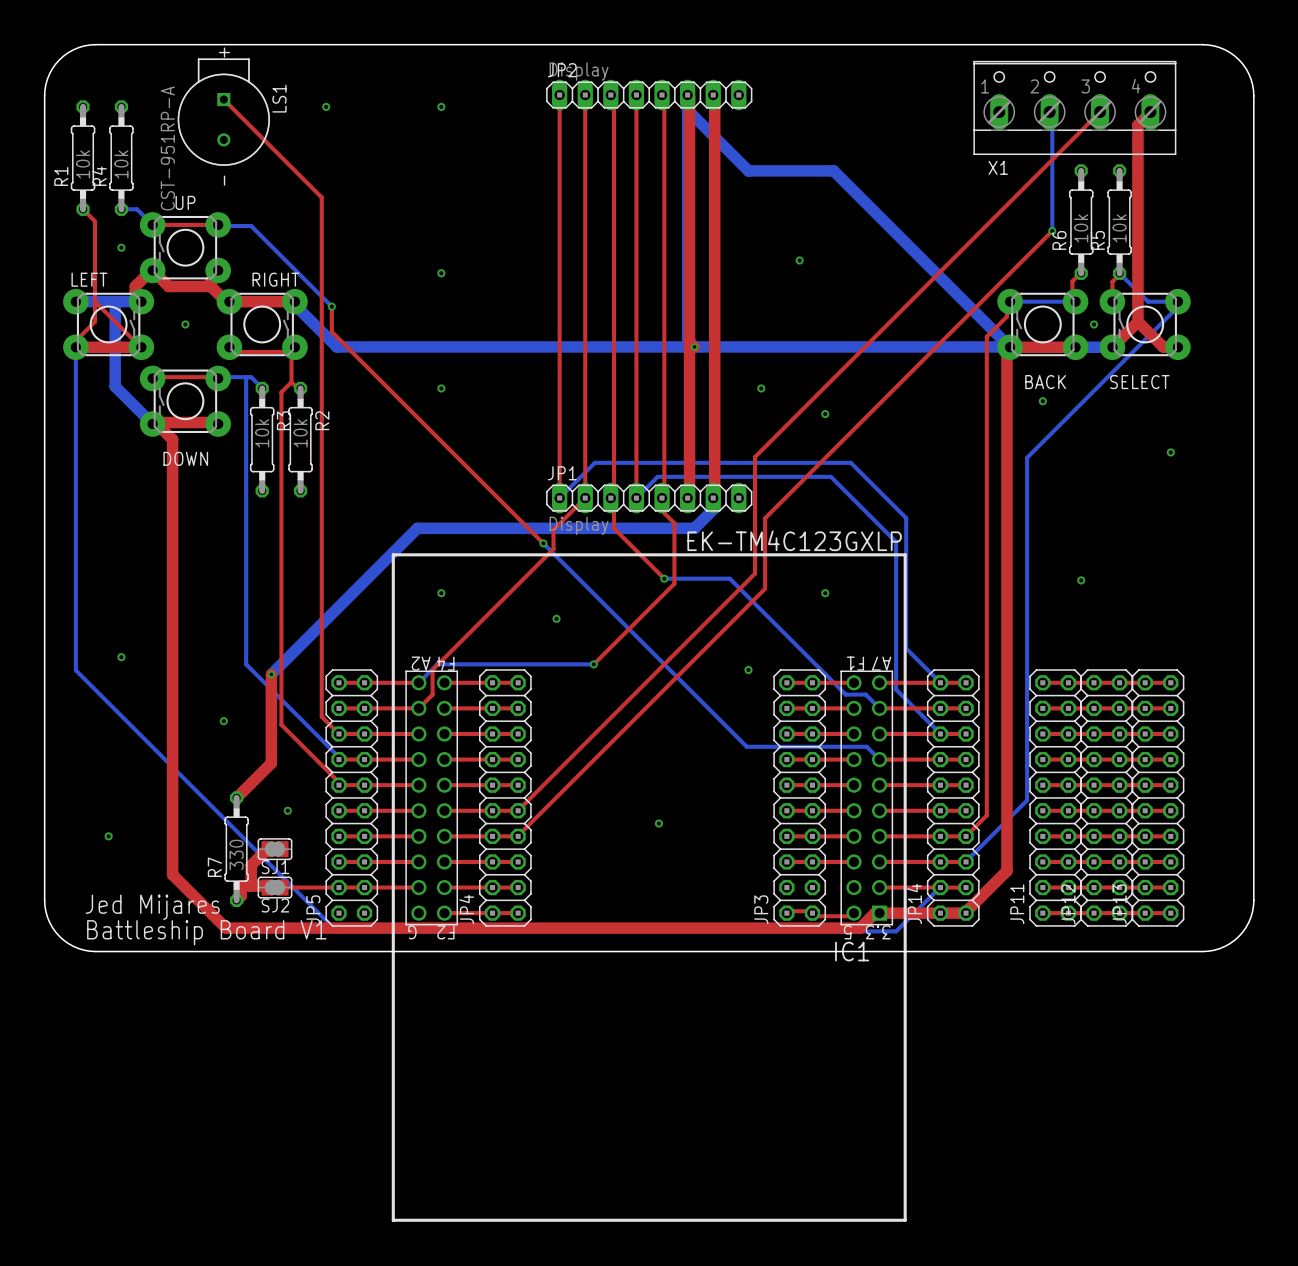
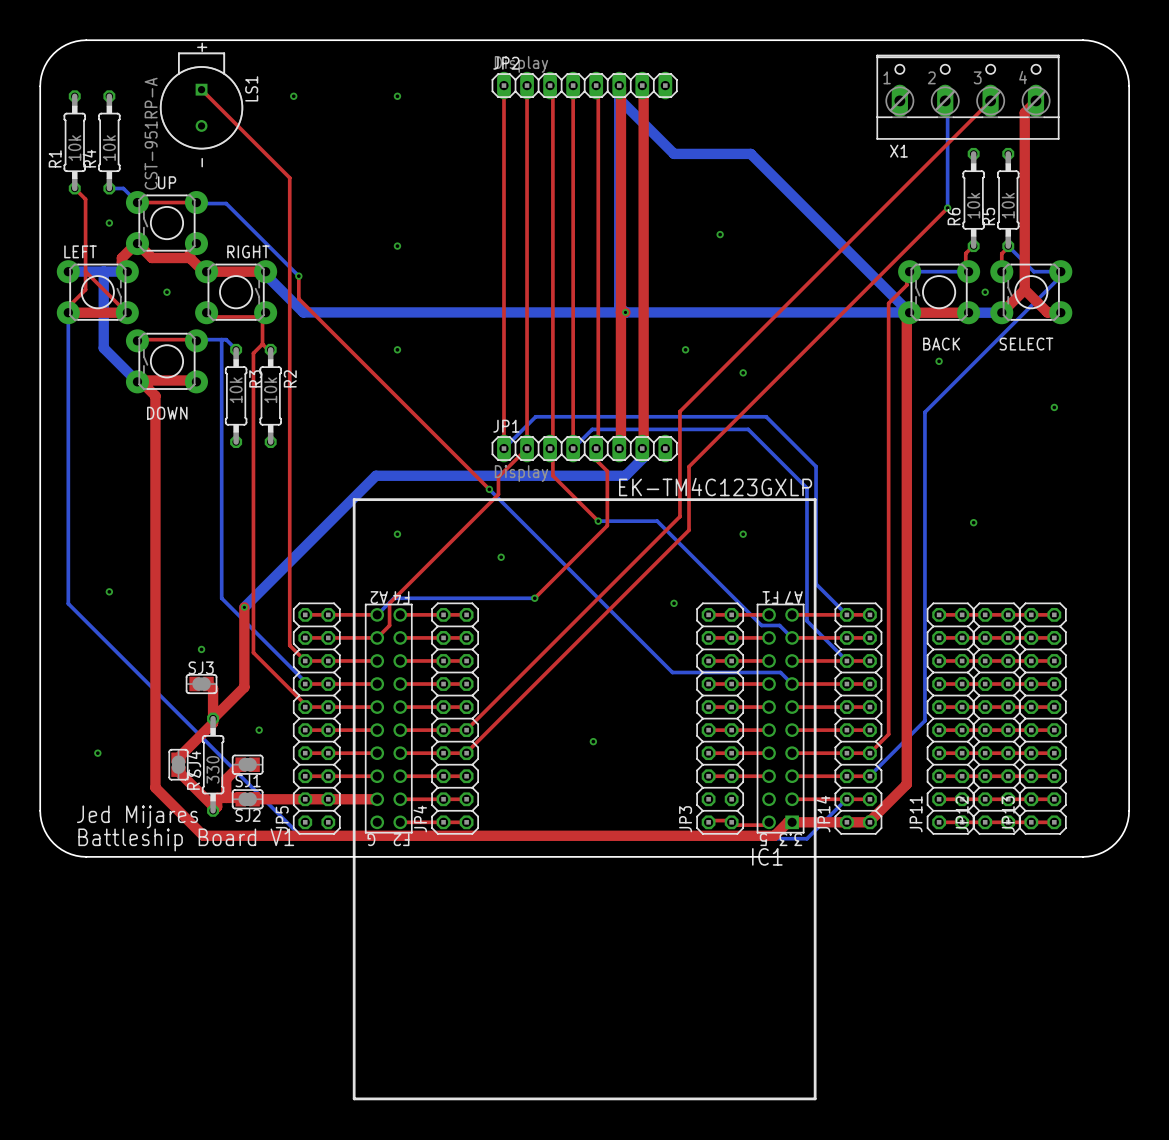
SJ3: none -> (201, 684)
top track: none -> (208, 684) (213, 688) (213, 723) (178, 757)
SJ4: none -> (178, 764)
top track: none -> (178, 771) (213, 806) (213, 810)
top track width: thin (282, 887) (418, 887) -> thick (254, 799) (377, 799)

